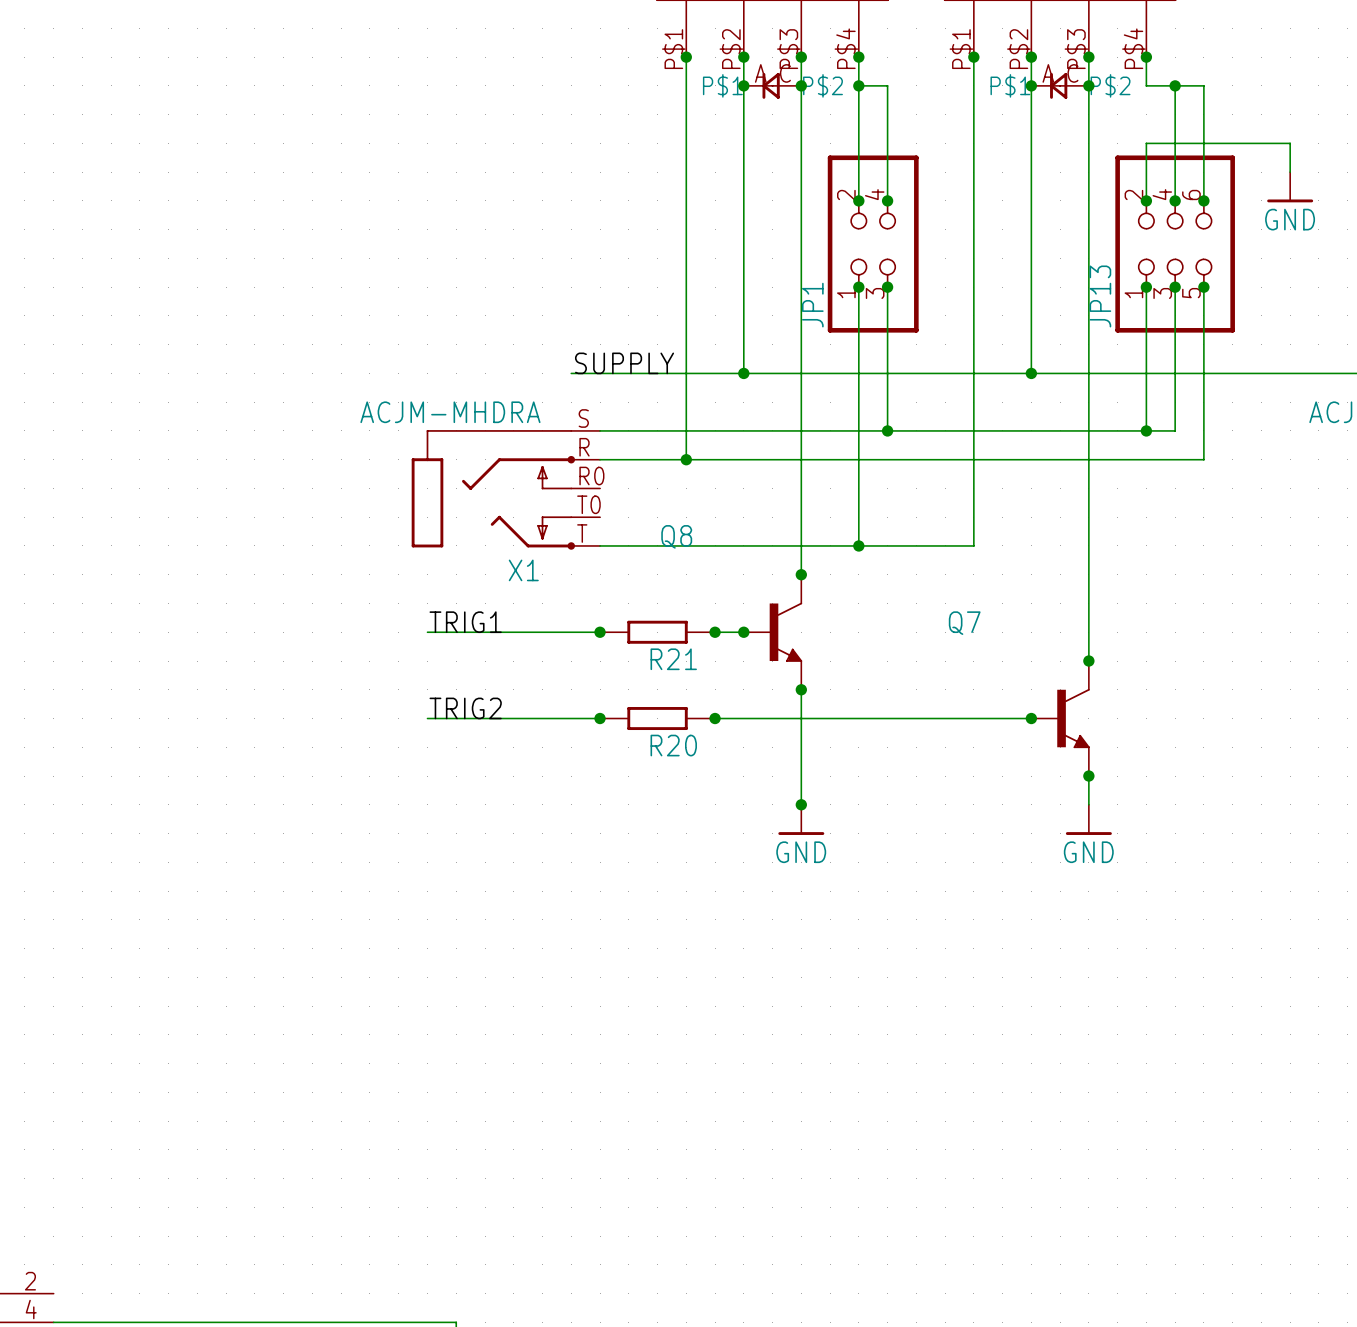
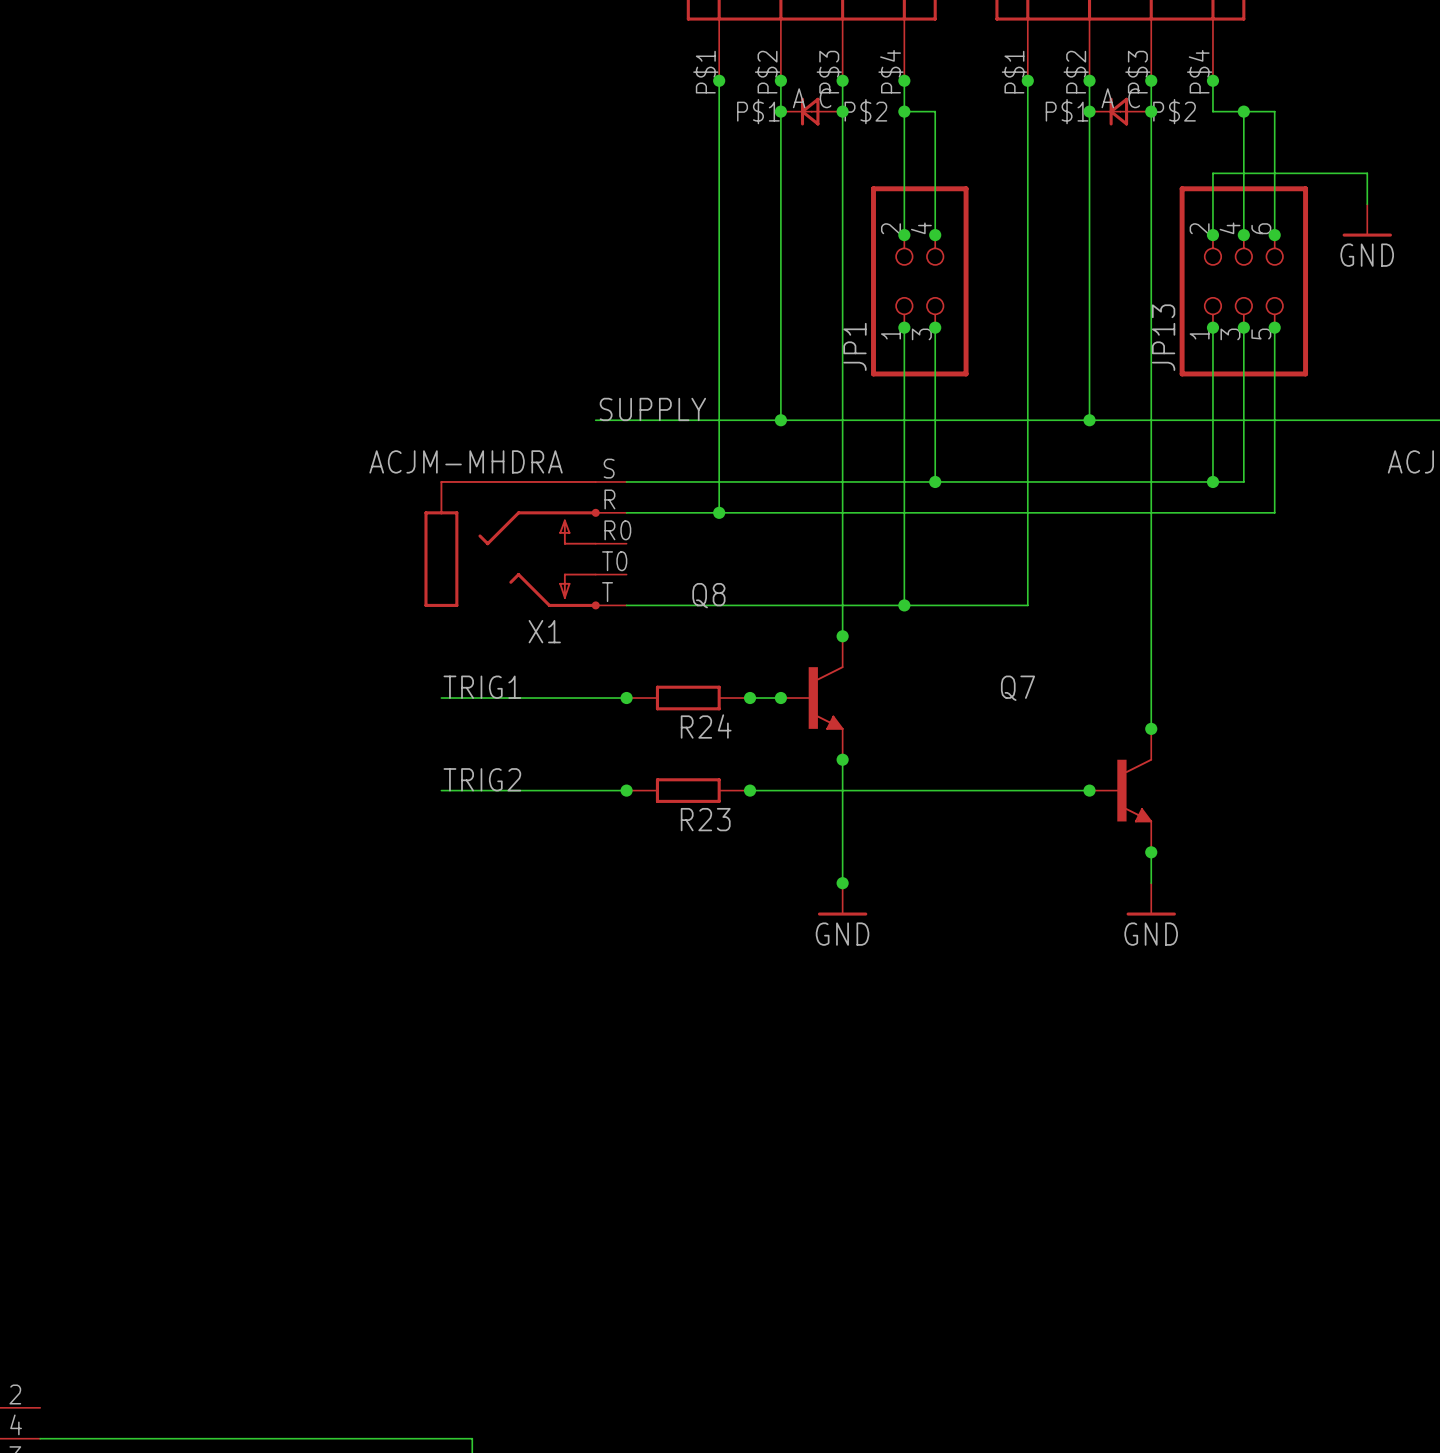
R21 name: R21 (673, 659) -> R24 (706, 726)
R20 name: R20 (673, 745) -> R23 (705, 819)

